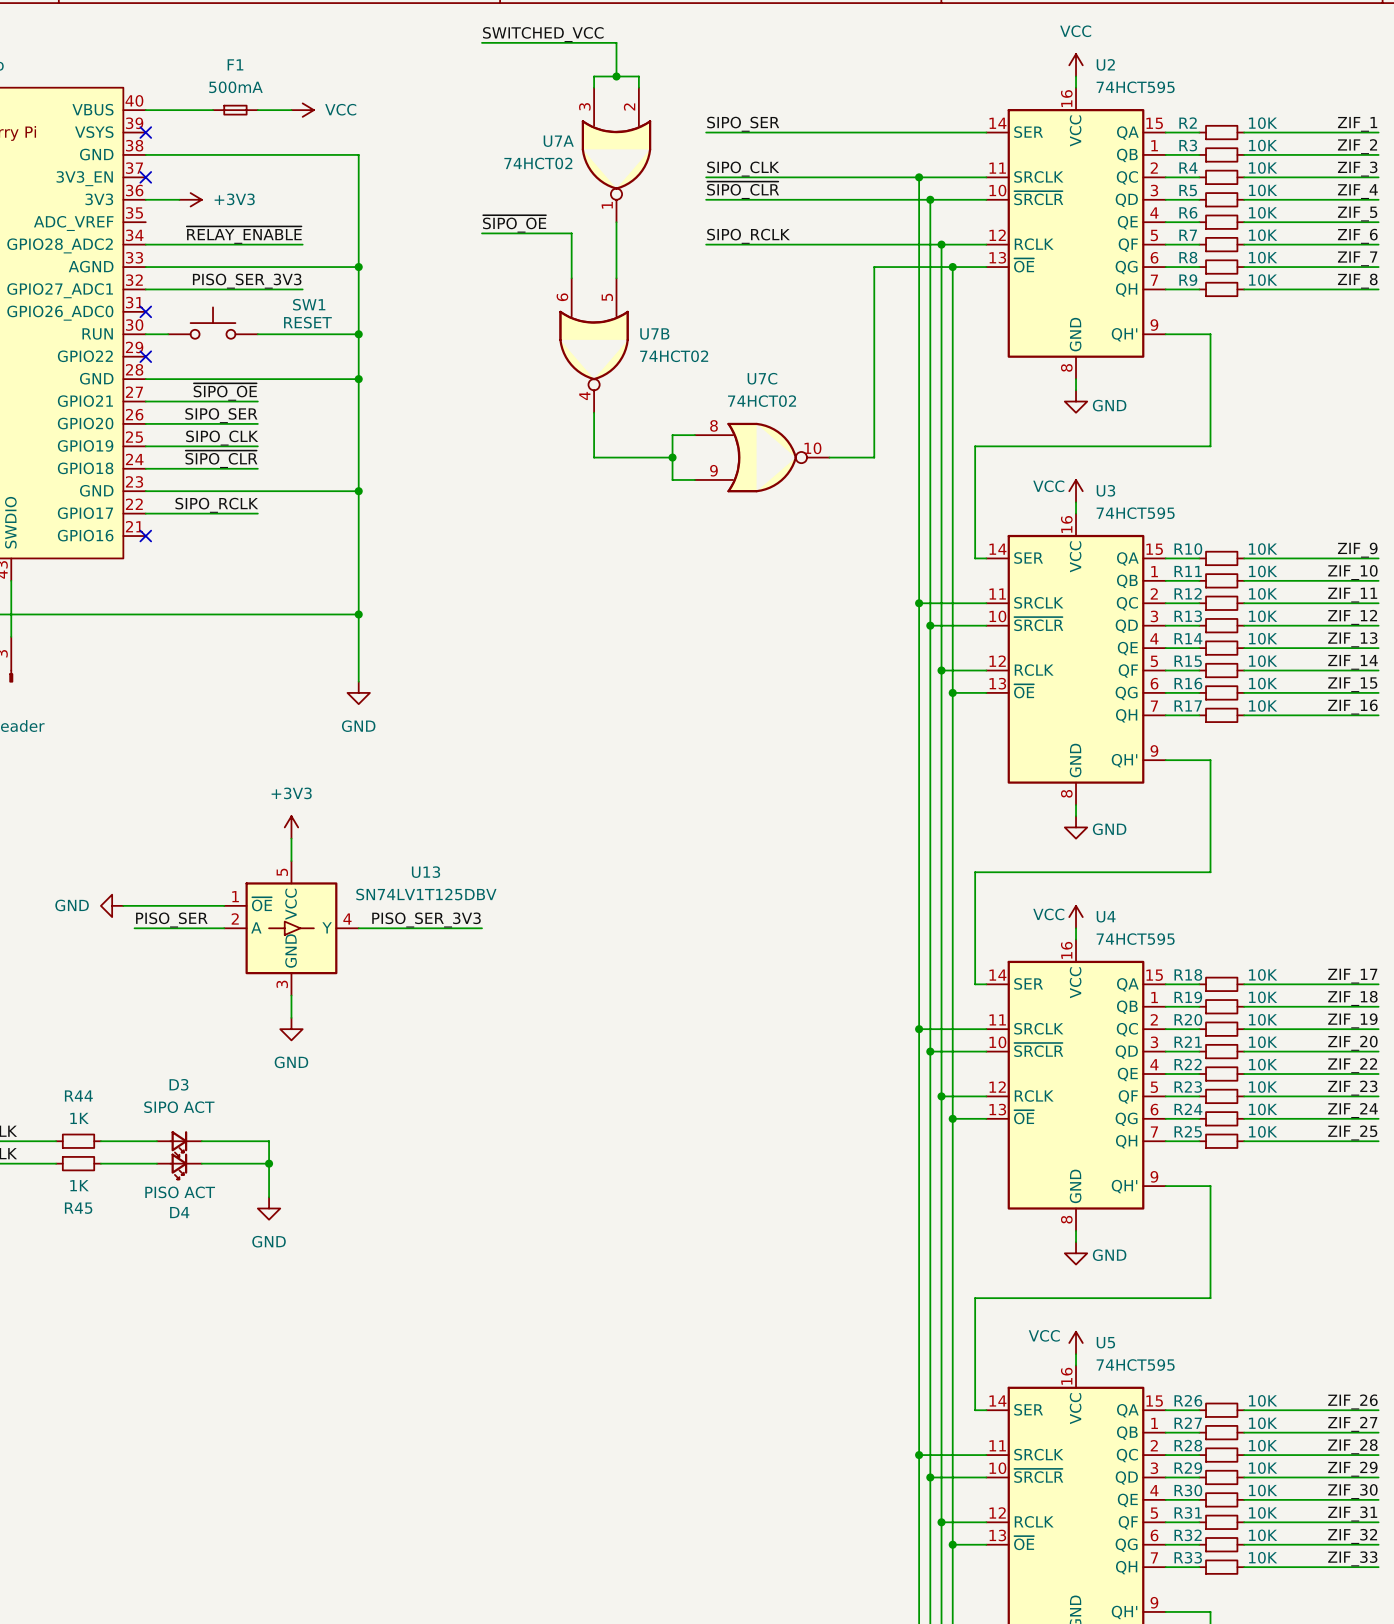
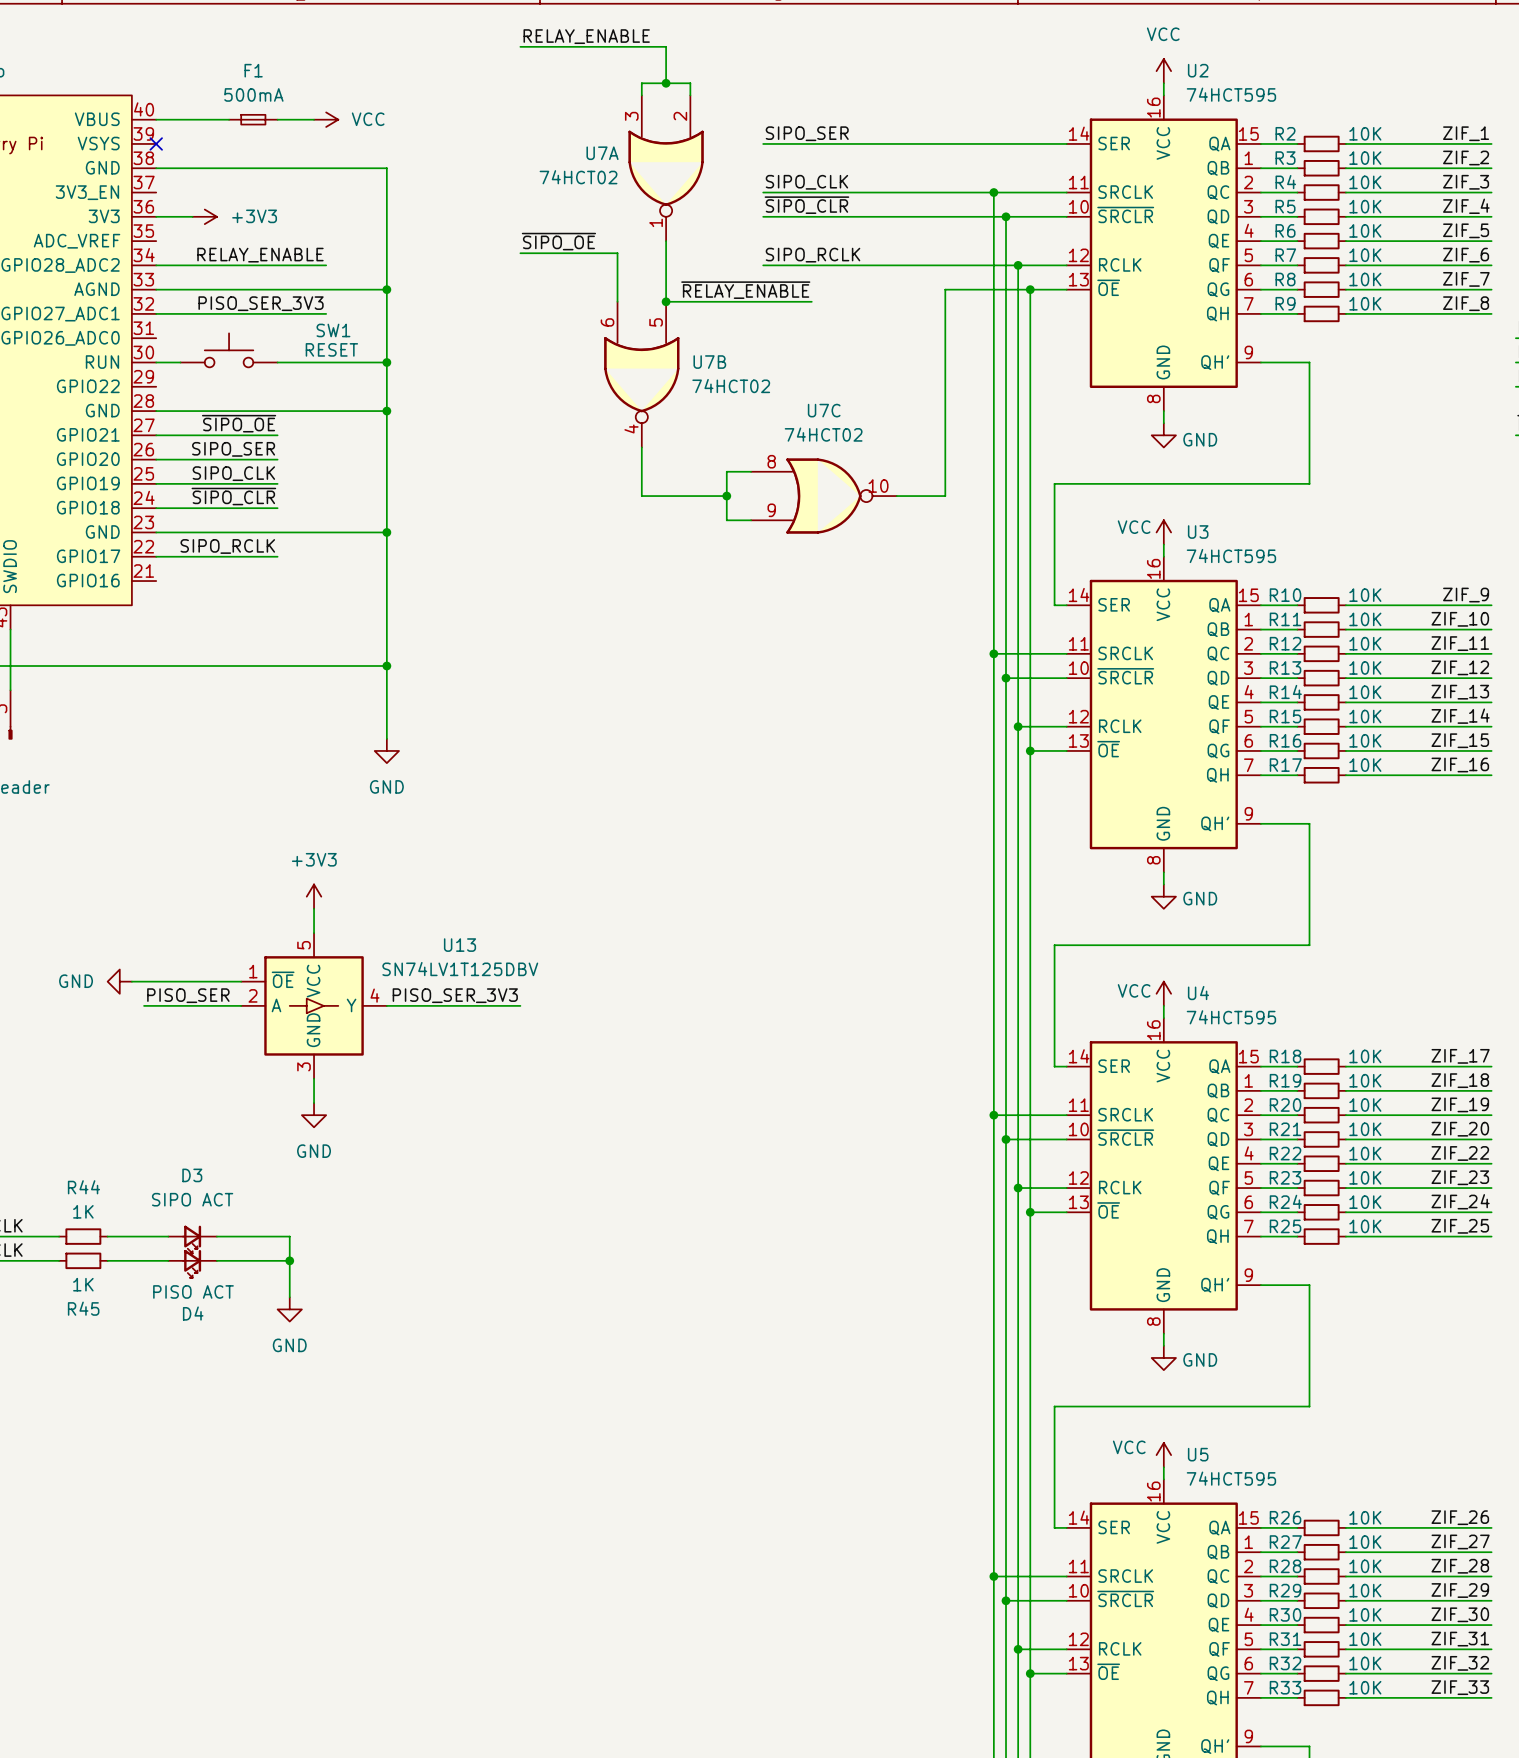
label: SWITCHED_VCC (543, 34) -> RELAY_ENABLE (586, 36)
no-connect mark: (145, 177) -> none
label: ~{RELAY_ENABLE} (244, 235) -> RELAY_ENABLE (260, 255)
label: none -> ~{RELAY_ENABLE} (745, 290)
wire: none -> (666, 301) (811, 301)
junction: none -> (666, 301)
no-connect mark: (145, 311) -> none
no-connect mark: (145, 356) -> none
no-connect mark: (145, 536) -> none

